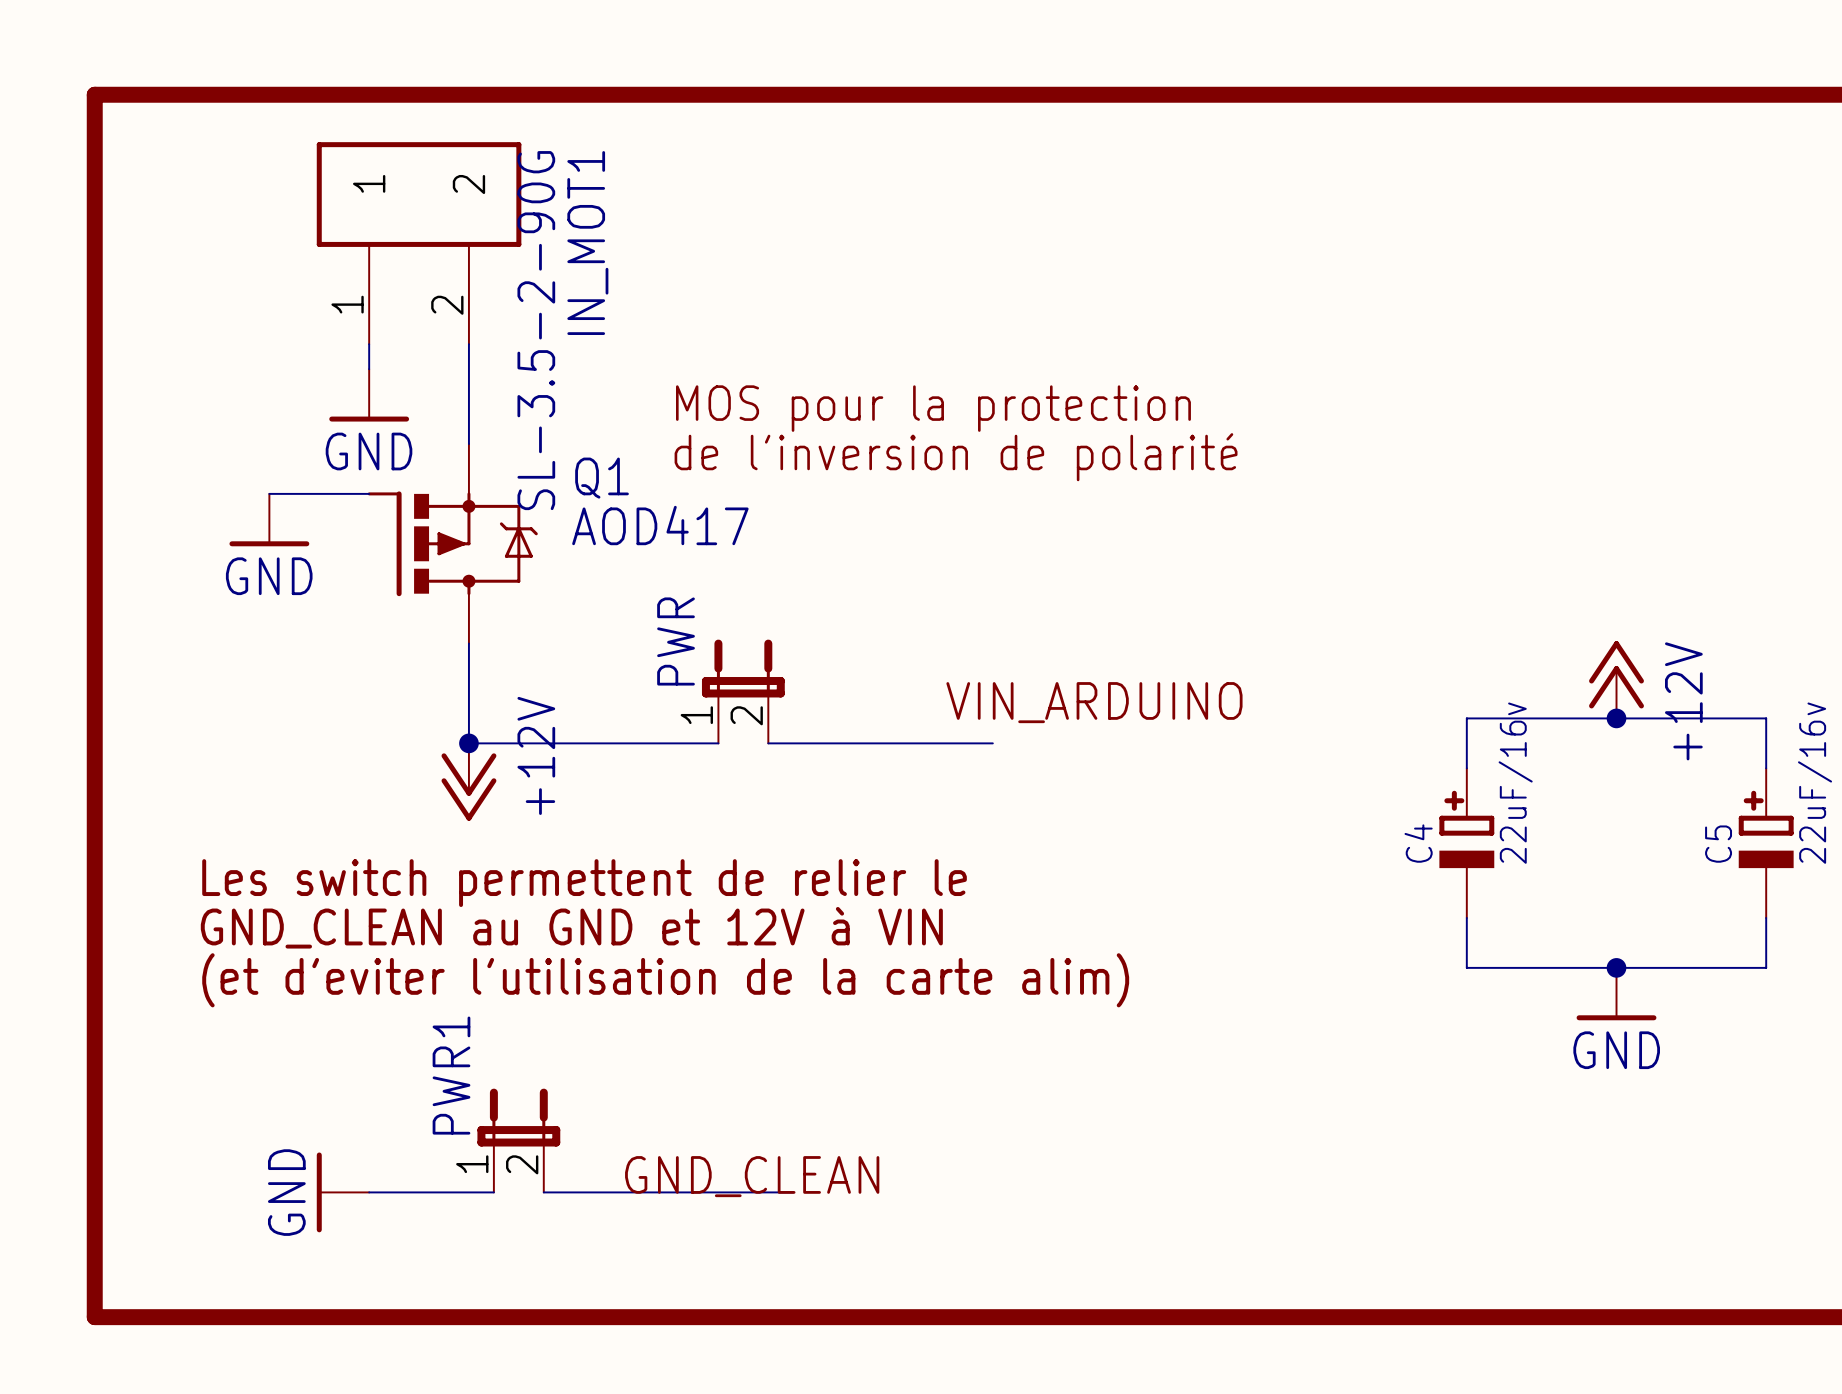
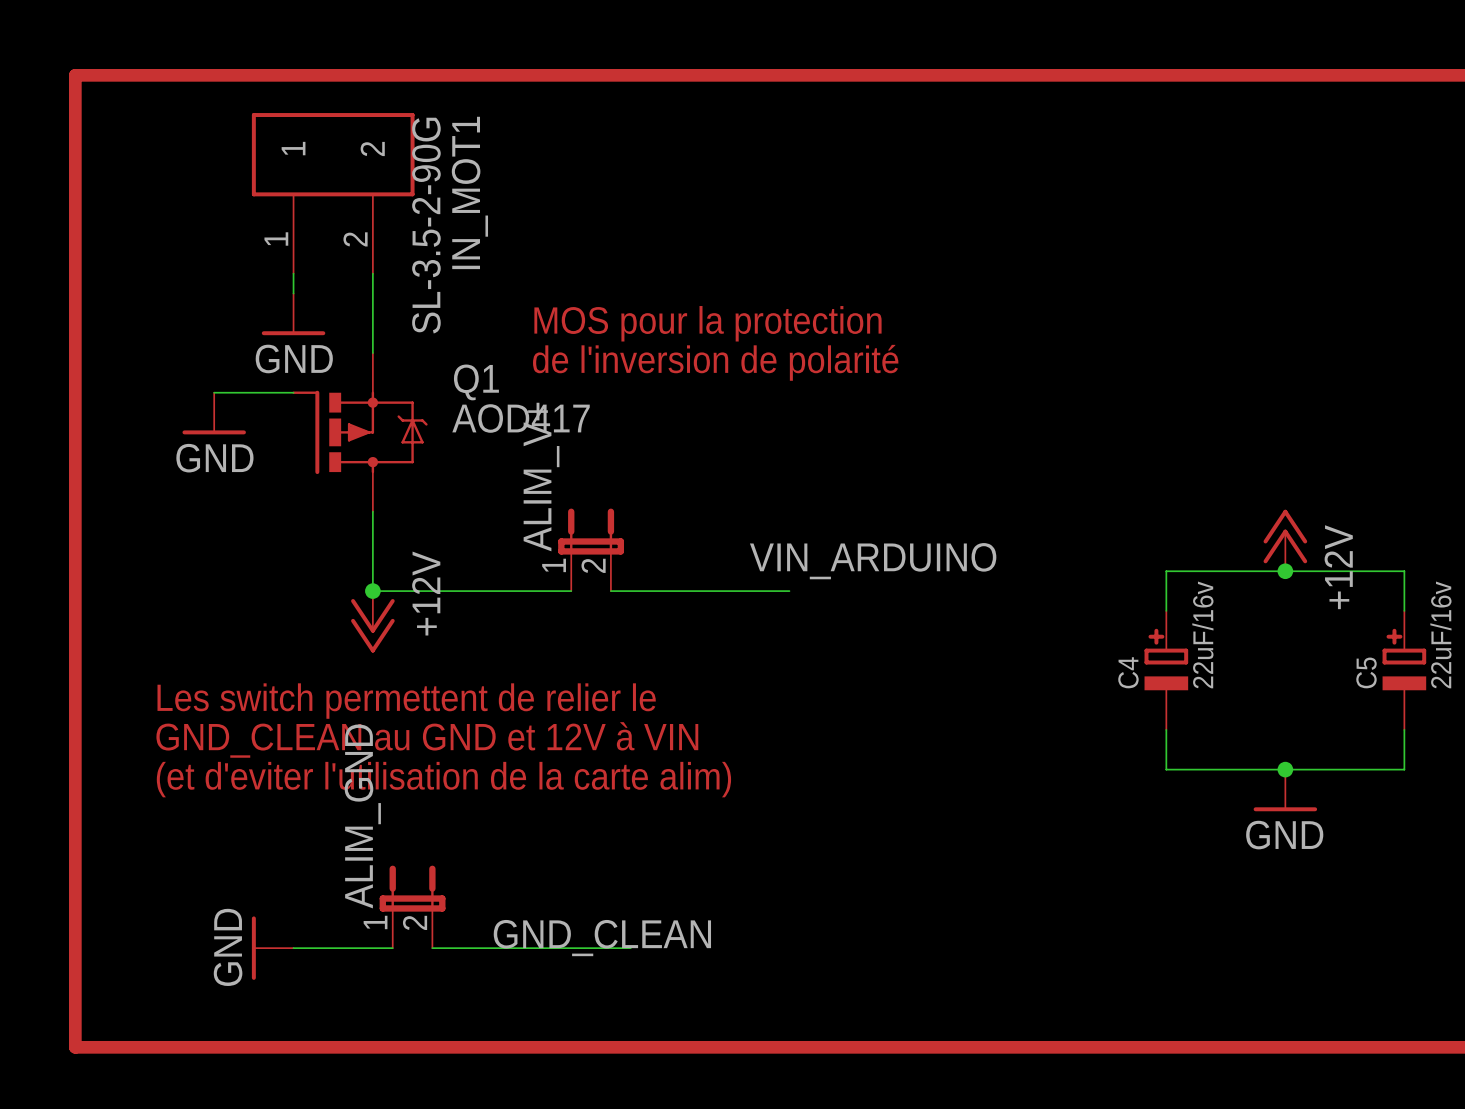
PWR name: PWR (676, 641) -> ALIM_V+ (541, 477)
PWR1 name: PWR1 (451, 1075) -> ALIM_GND (362, 816)

